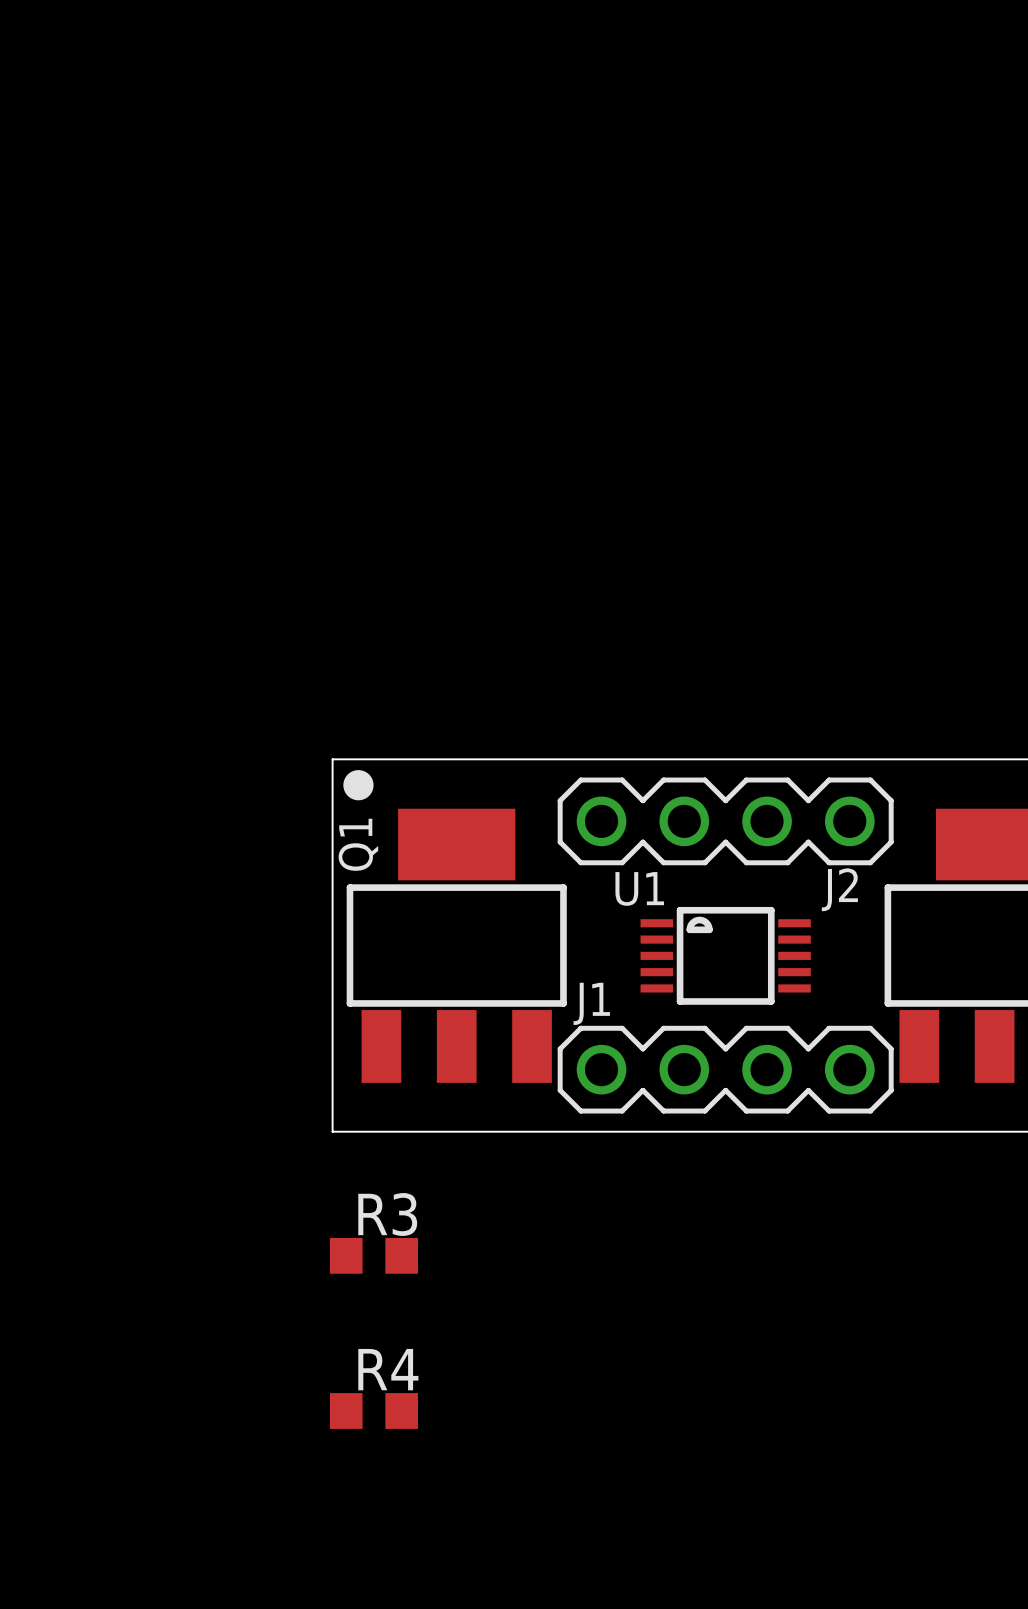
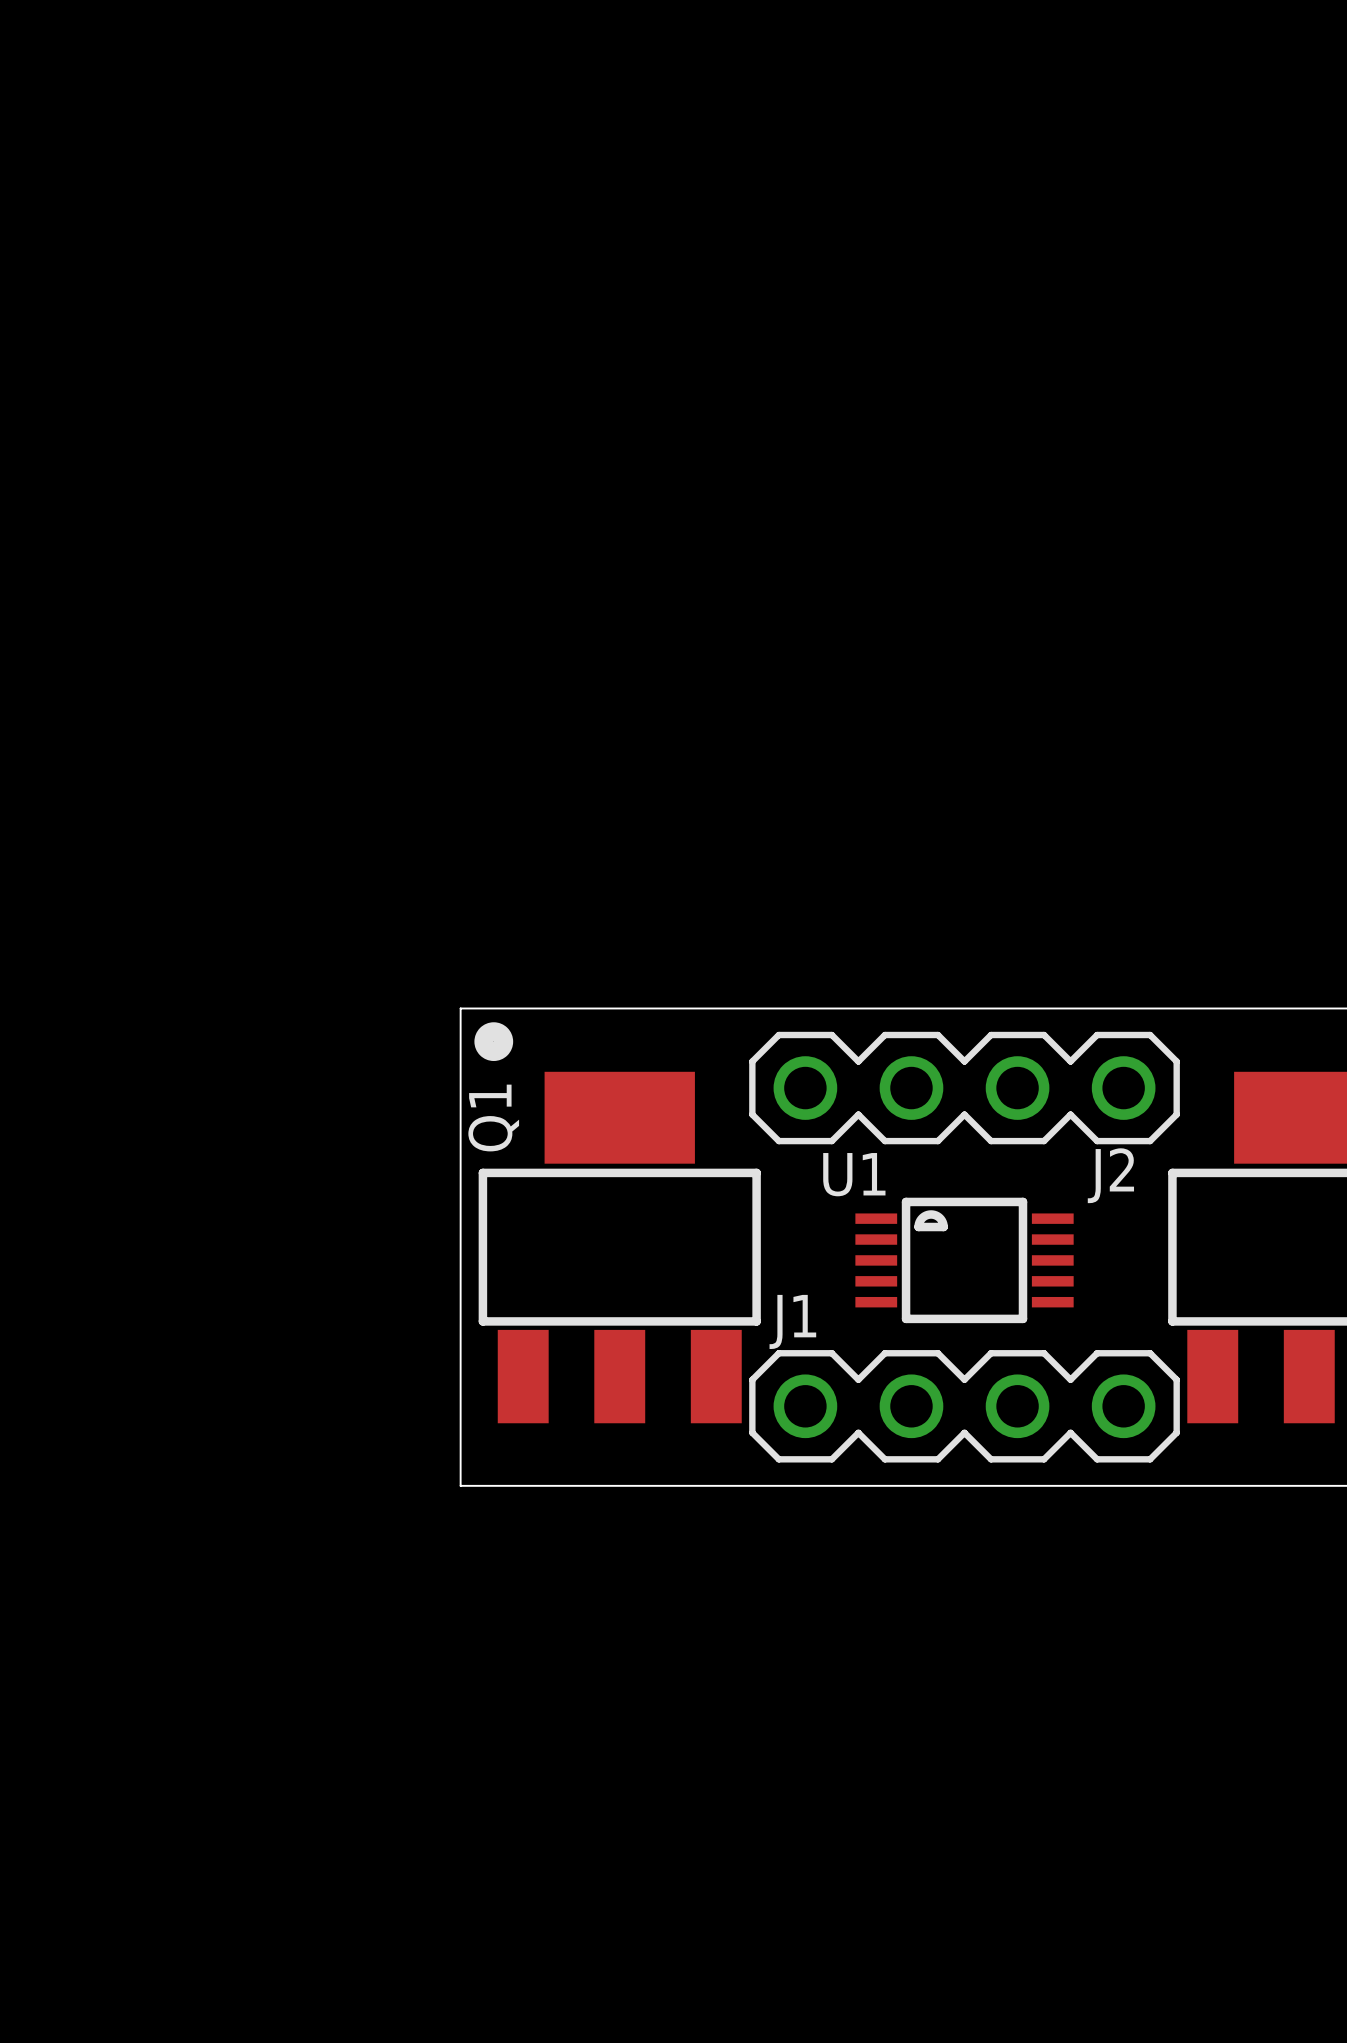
R3: (373, 1255) -> none
R4: (373, 1411) -> none

